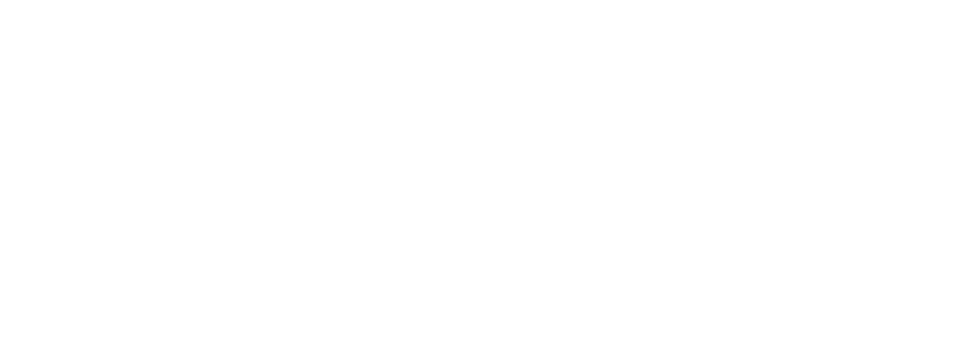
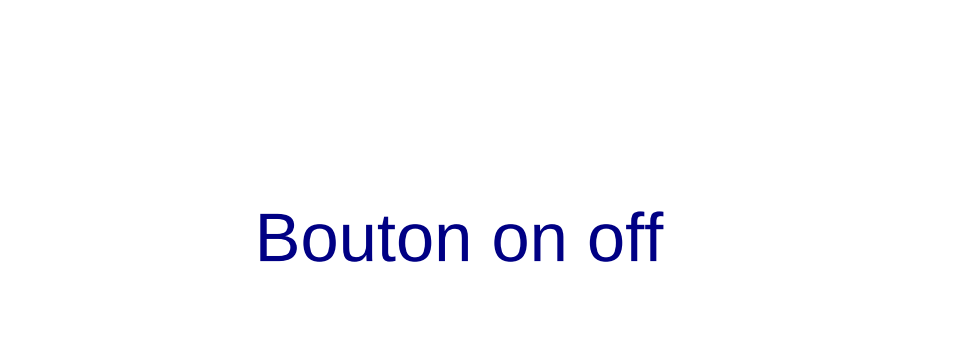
text: none -> Bouton on off (461, 236)

